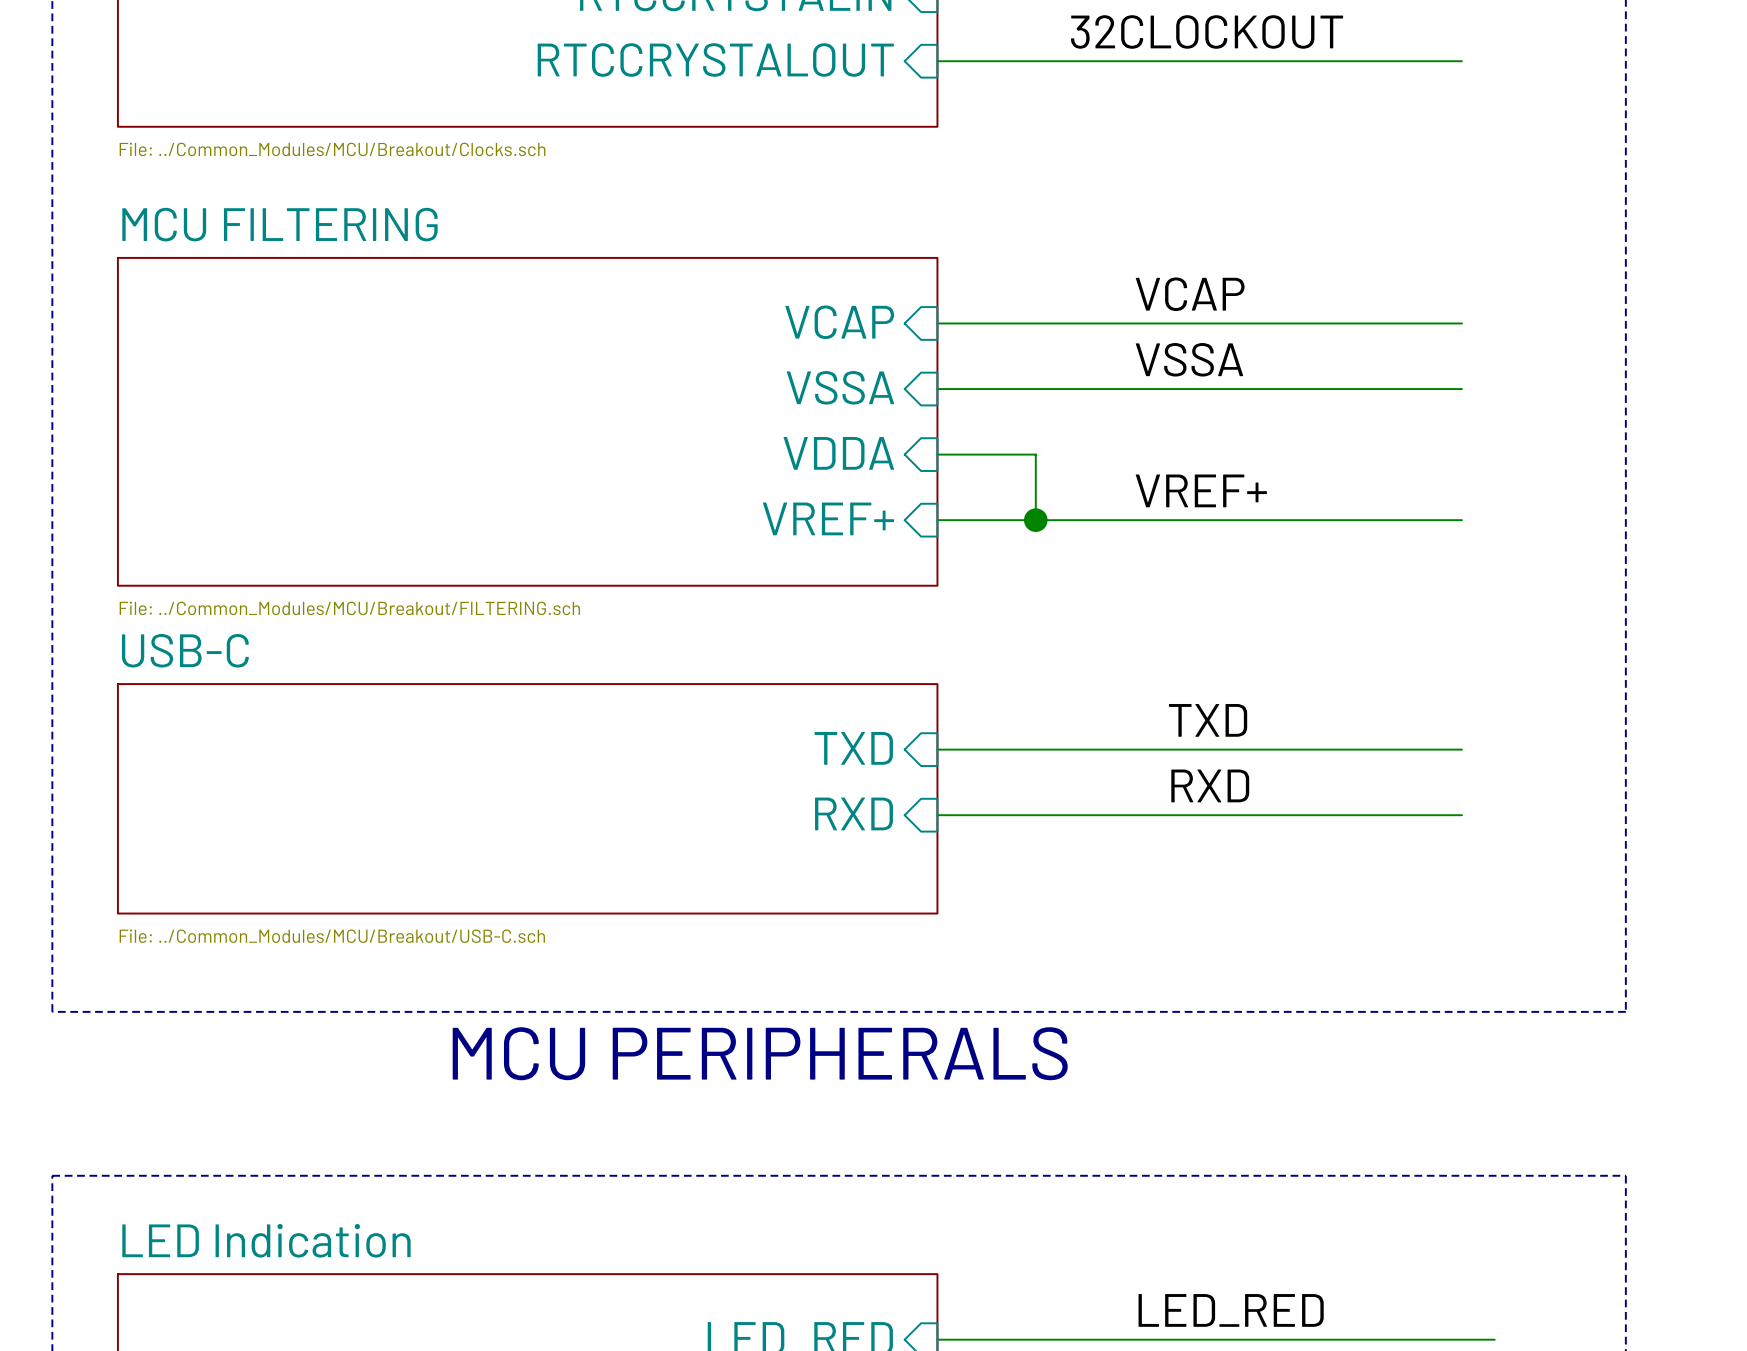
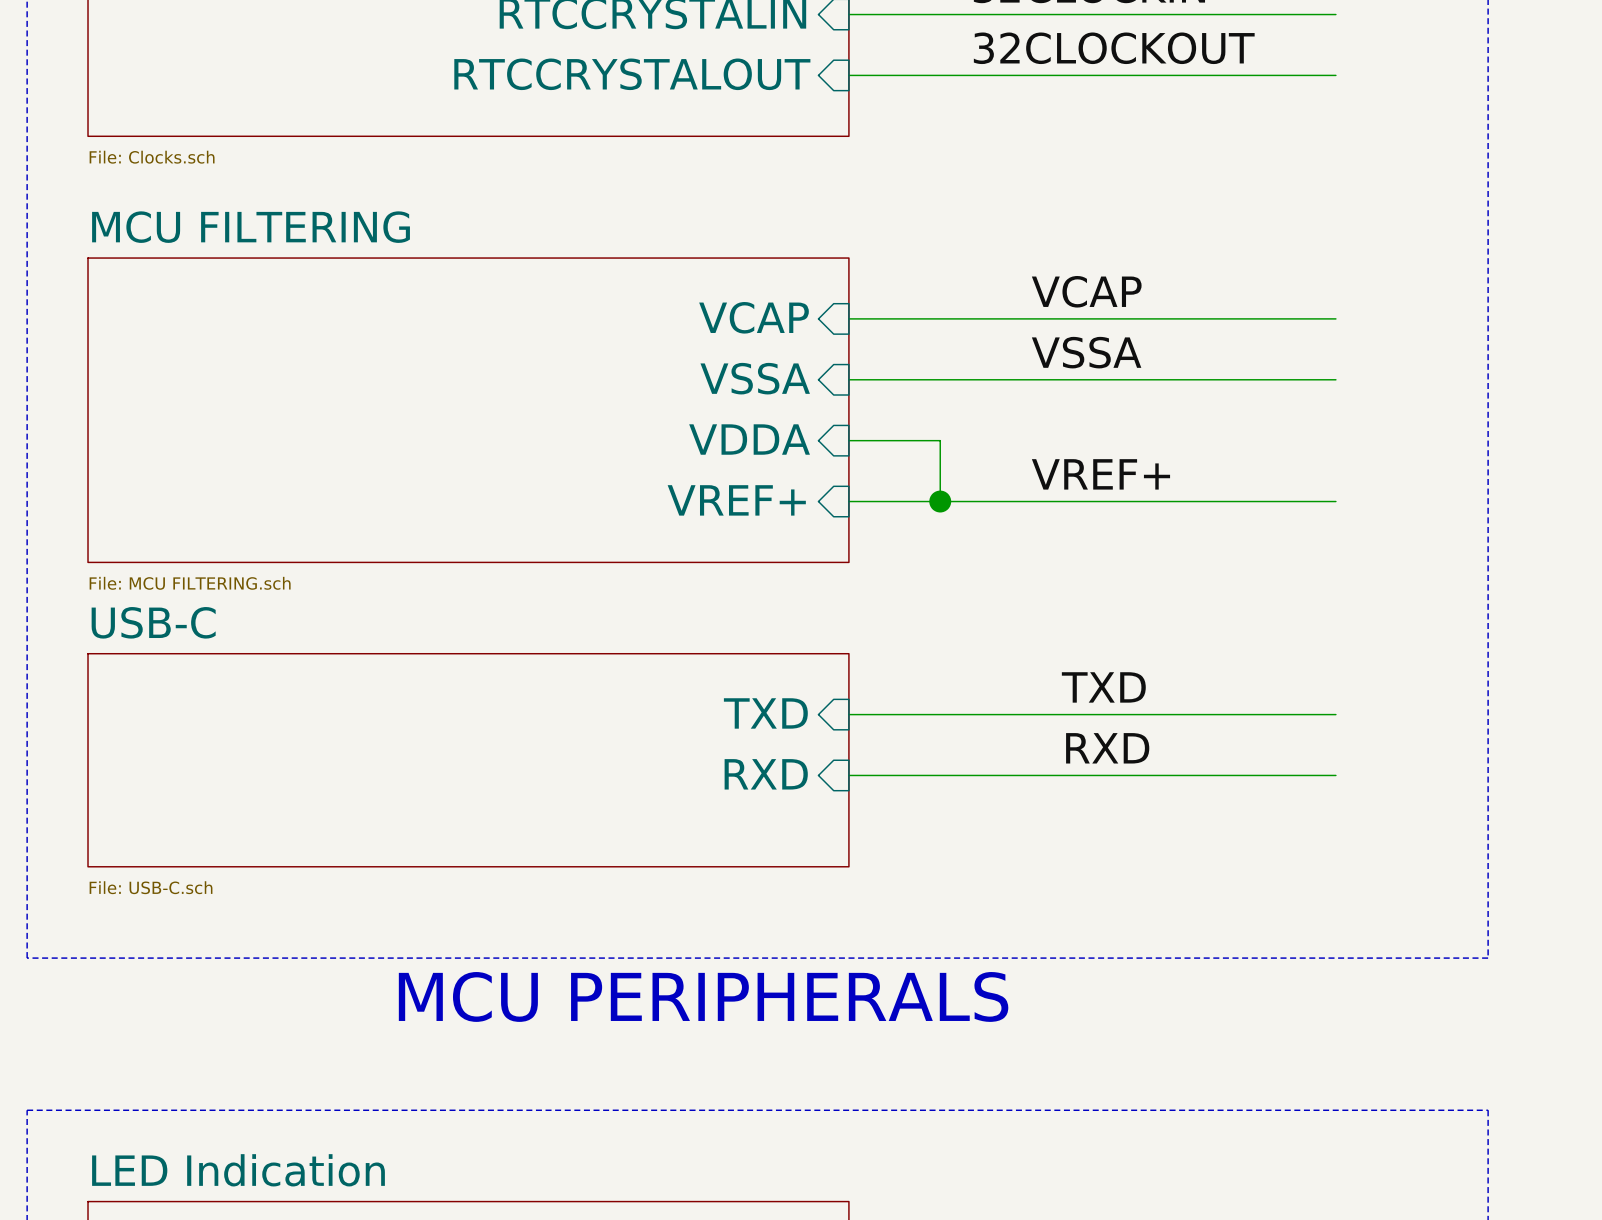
sheet value: File: ../Common_Modules/MCU/Breakout/Clocks.sch (332, 149) -> File: Clocks.sch (152, 157)
sheet MCU FILTERING value: File: ../Common_Modules/MCU/Breakout/FILTERING.sch (349, 608) -> File: MCU FILTERING.sch (190, 583)
sheet USB-C value: File: ../Common_Modules/MCU/Breakout/USB-C.sch (332, 936) -> File: USB-C.sch (151, 887)

